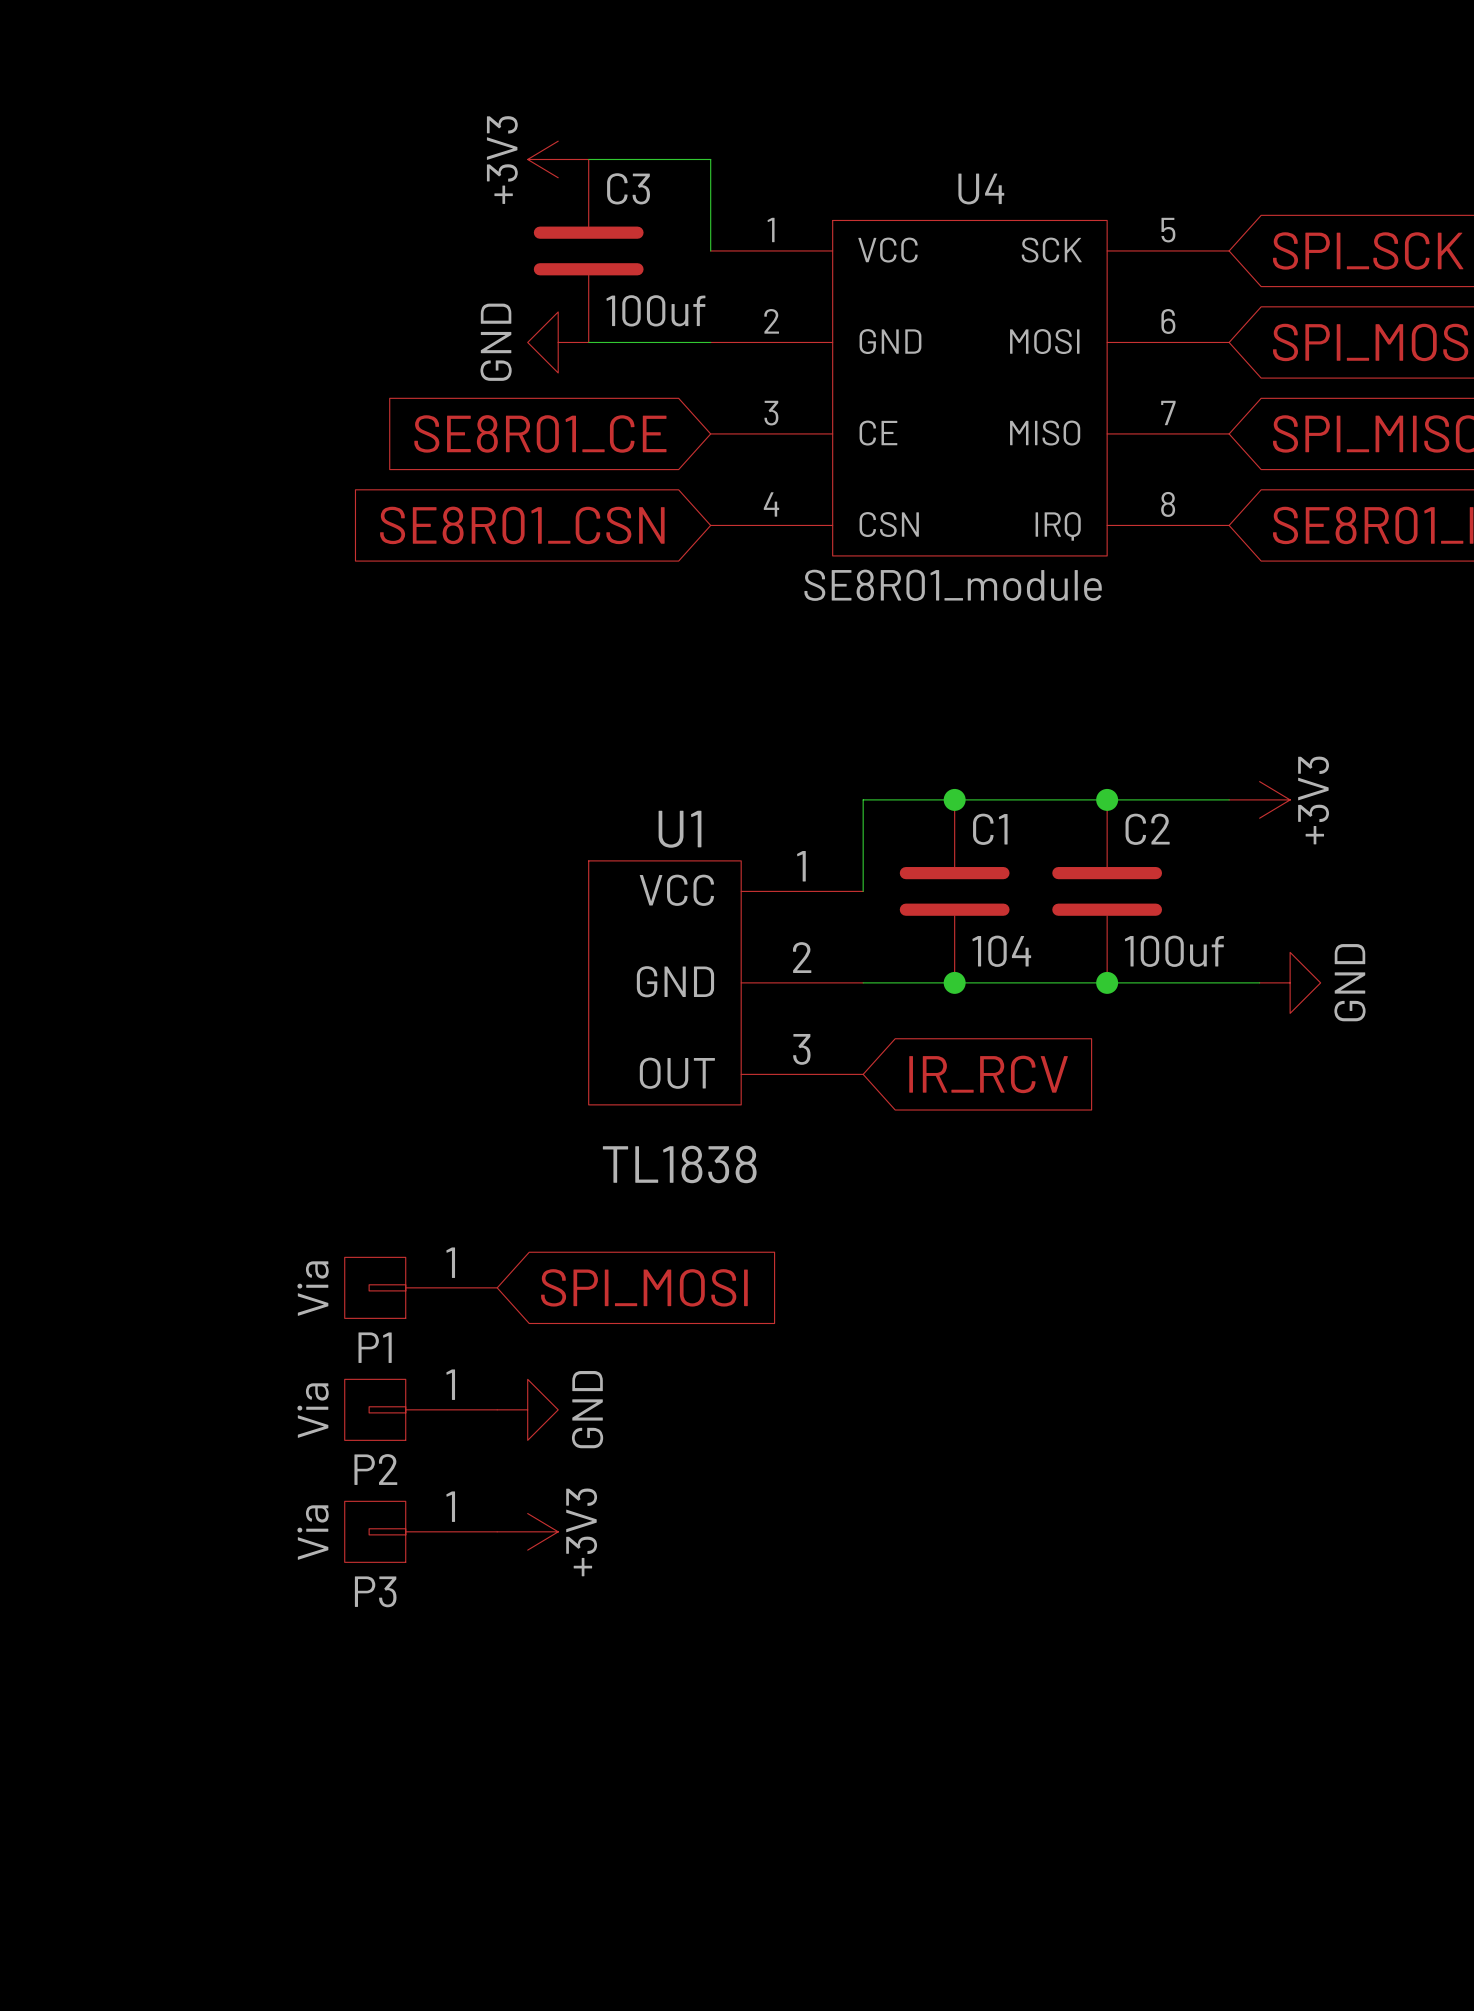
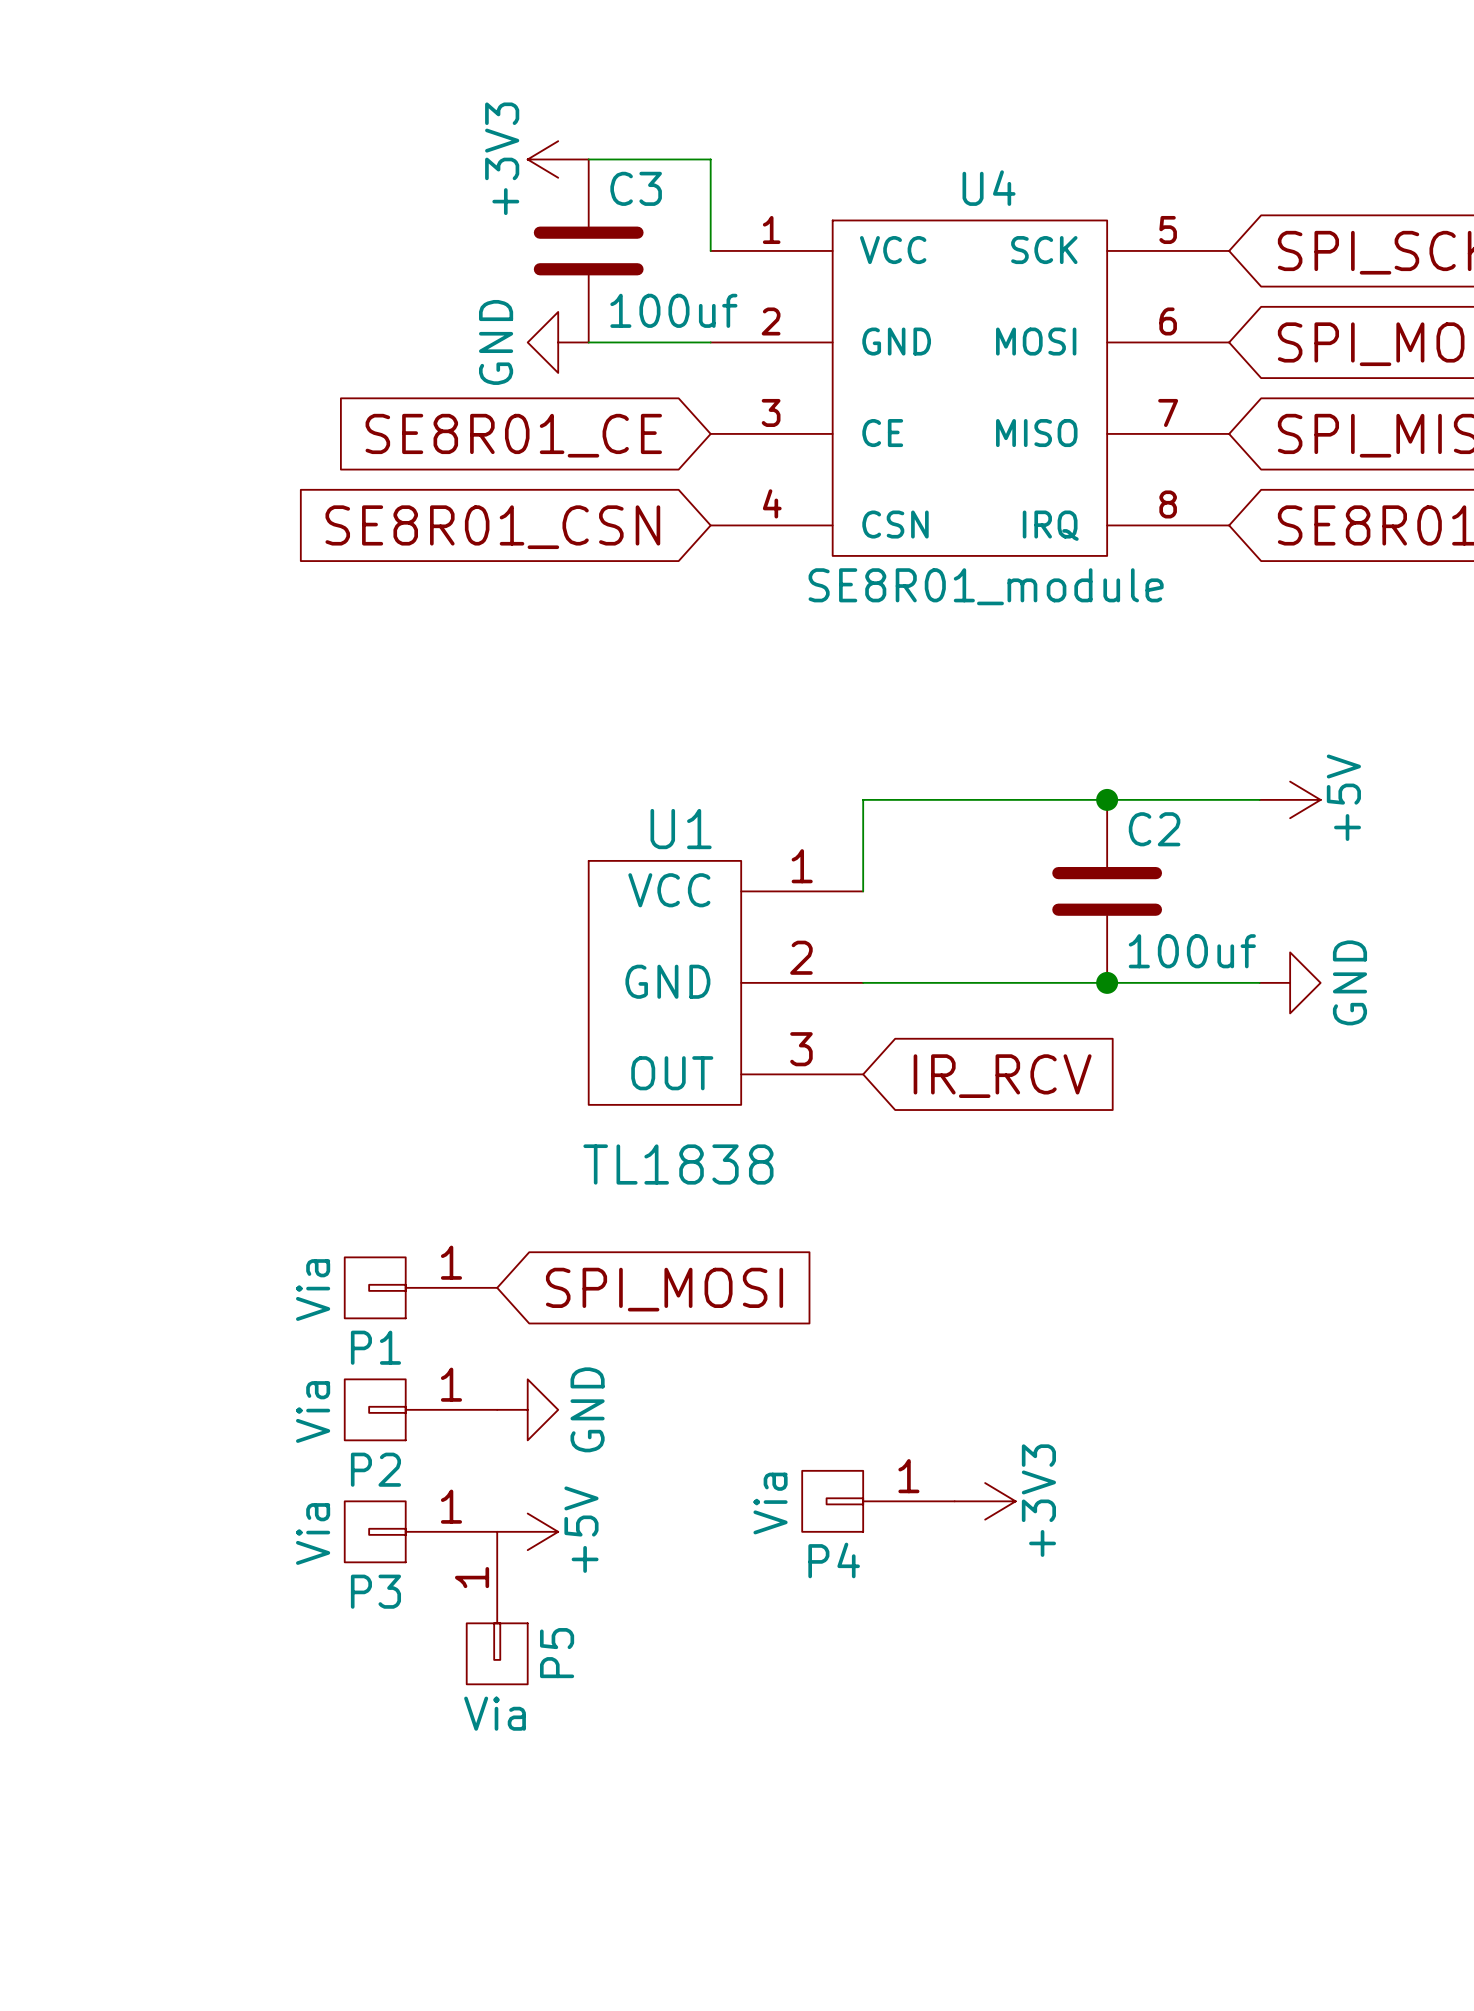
junction: (954, 799) -> none
power symbol: +3V3 (1259, 799) -> none
power symbol: none -> +5V (1290, 799)
C1: 104 (954, 891) -> none
junction: (954, 982) -> none
P4: none -> Via (878, 1501)
power symbol: none -> +3V3 (985, 1501)
power symbol: +3V3 (527, 1531) -> +5V (527, 1531)
P5: none -> Via (497, 1608)

